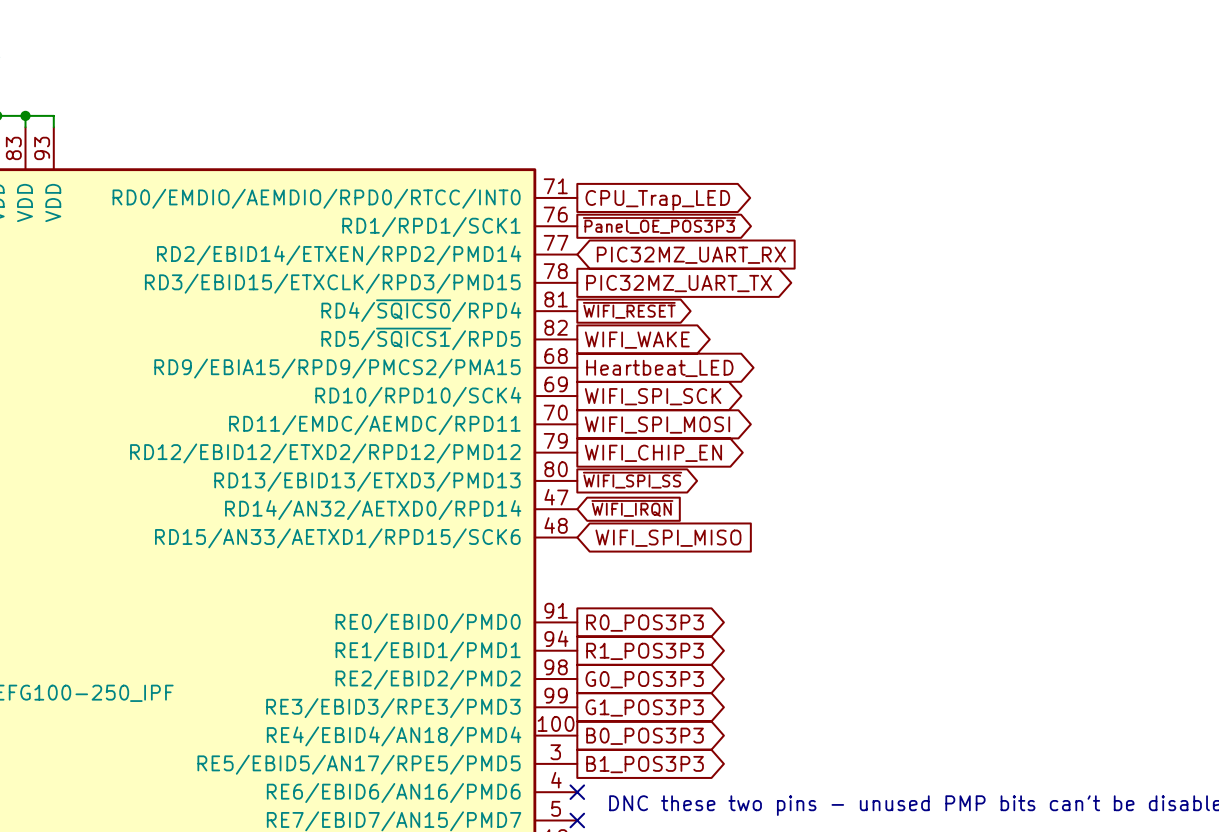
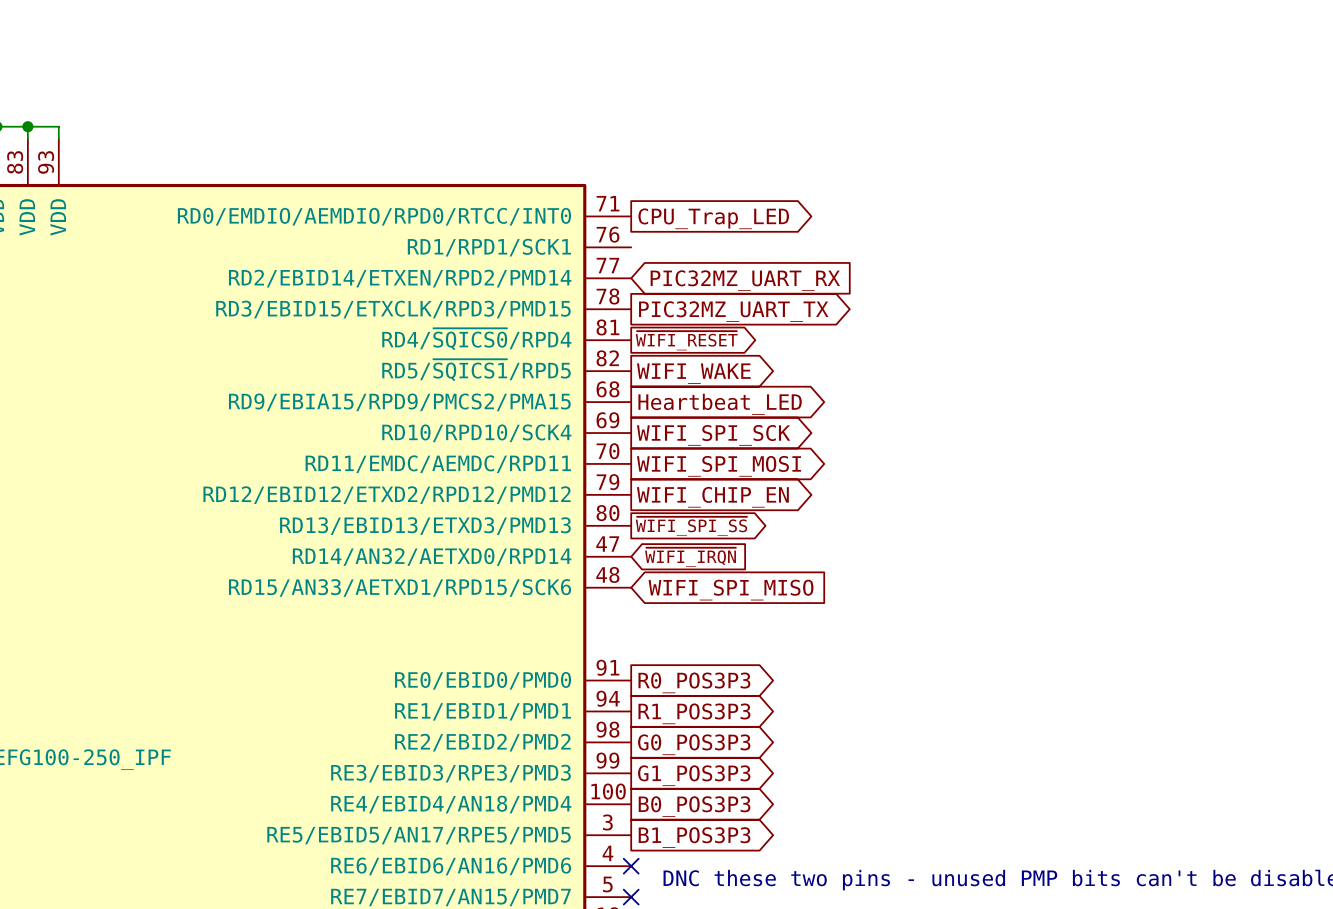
global label: ~{Panel_OE_POS3P3} (659, 225) -> none

